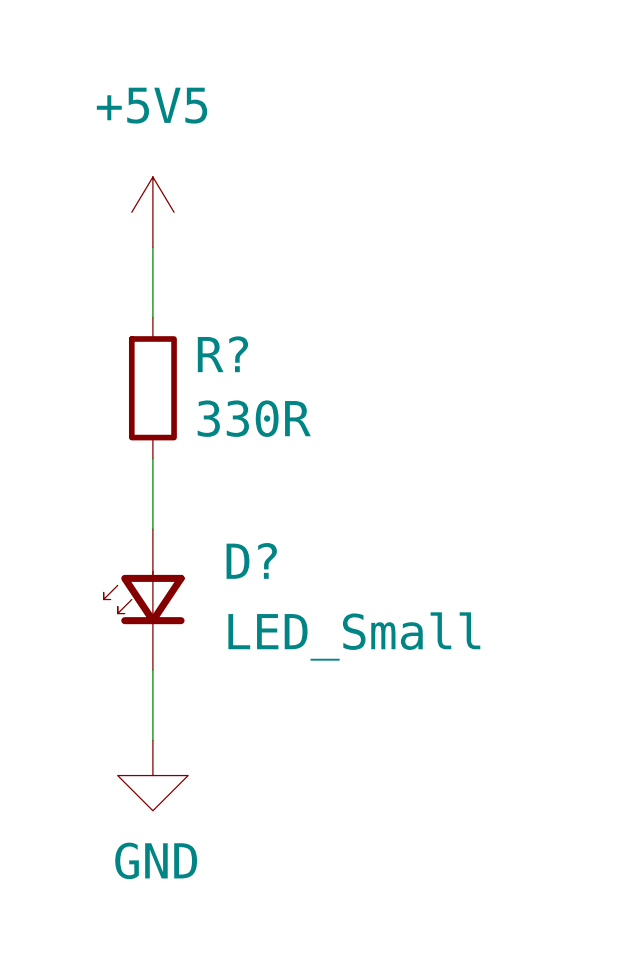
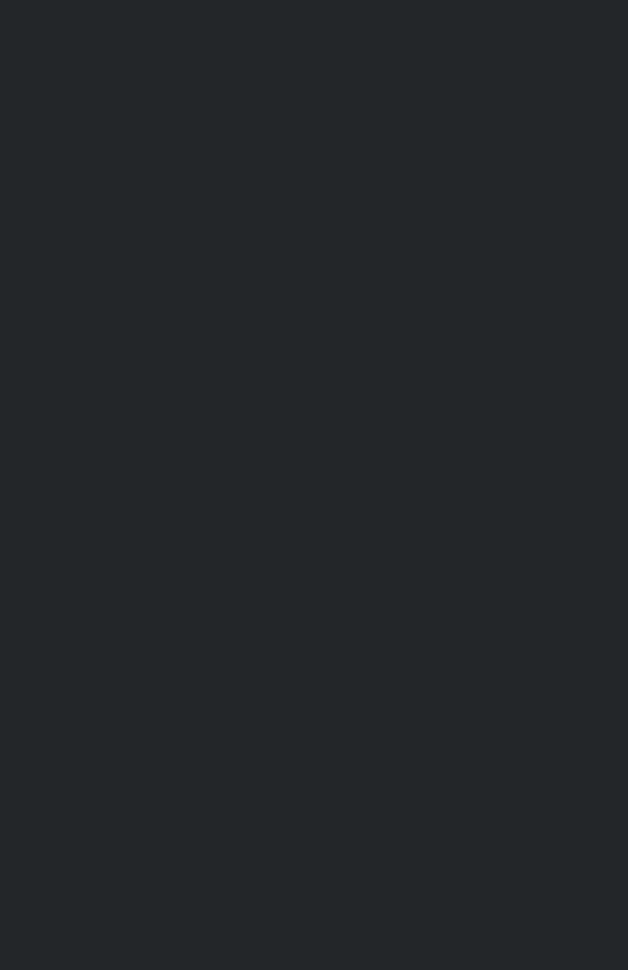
power symbol: +5V5 (152, 212) -> none
wire: (152, 247) (152, 317) -> none
R?: 330R (152, 388) -> none
wire: (152, 458) (152, 529) -> none
D?: LED_Small (144, 599) -> none
wire: (152, 669) (152, 740) -> none
power symbol: GND (152, 775) -> none

